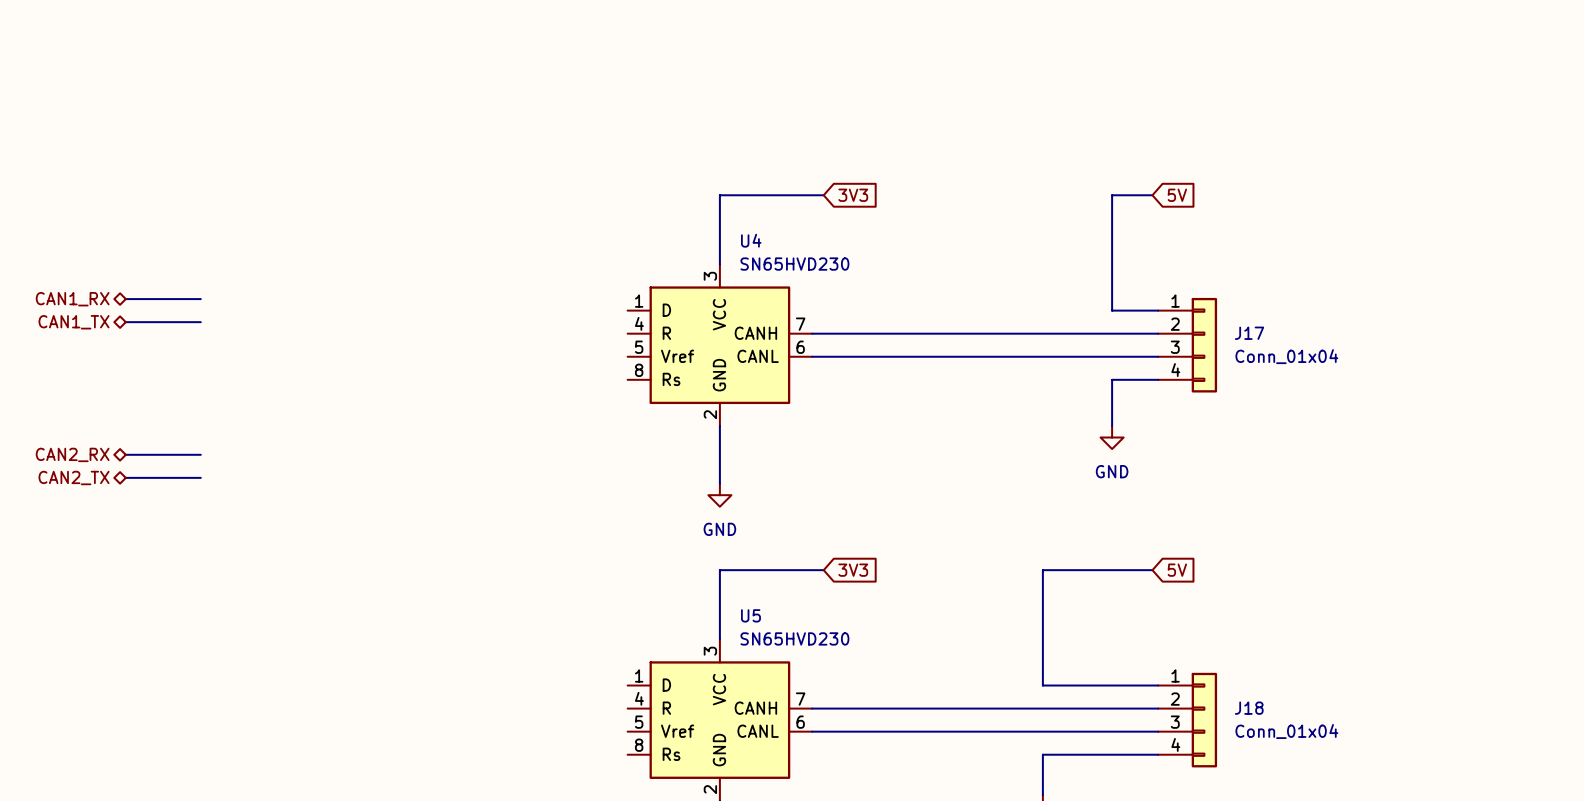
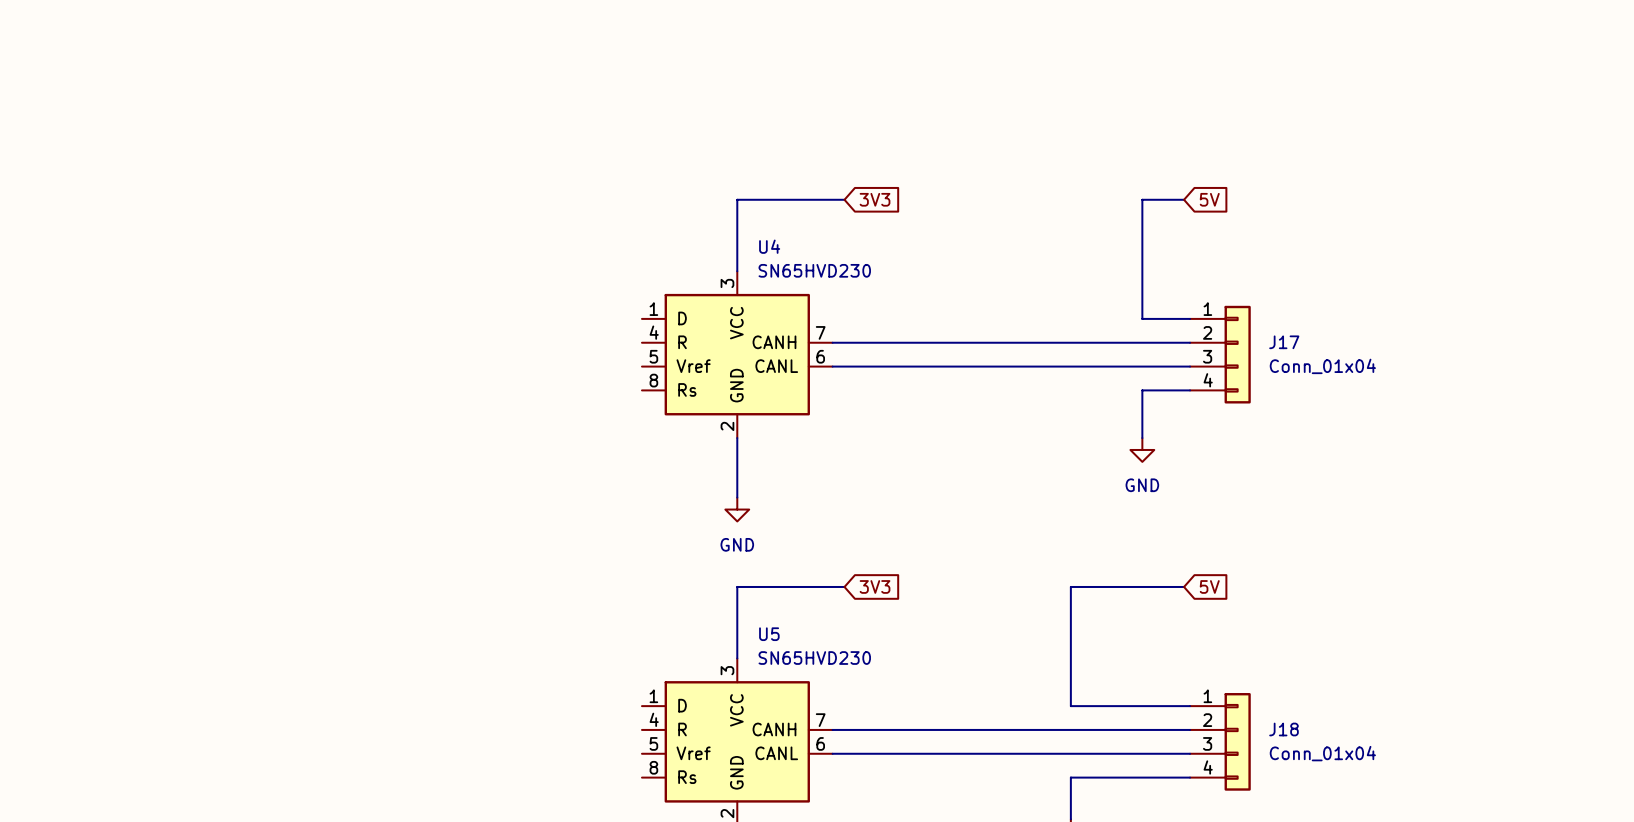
hierarchical label: CAN1_RX (72, 299) -> none
wire: (125, 299) (200, 299) -> none
hierarchical label: CAN1_TX (74, 322) -> none
wire: (125, 322) (200, 322) -> none
hierarchical label: CAN2_RX (72, 454) -> none
wire: (125, 454) (200, 454) -> none
hierarchical label: CAN2_TX (74, 477) -> none
wire: (125, 477) (200, 477) -> none

